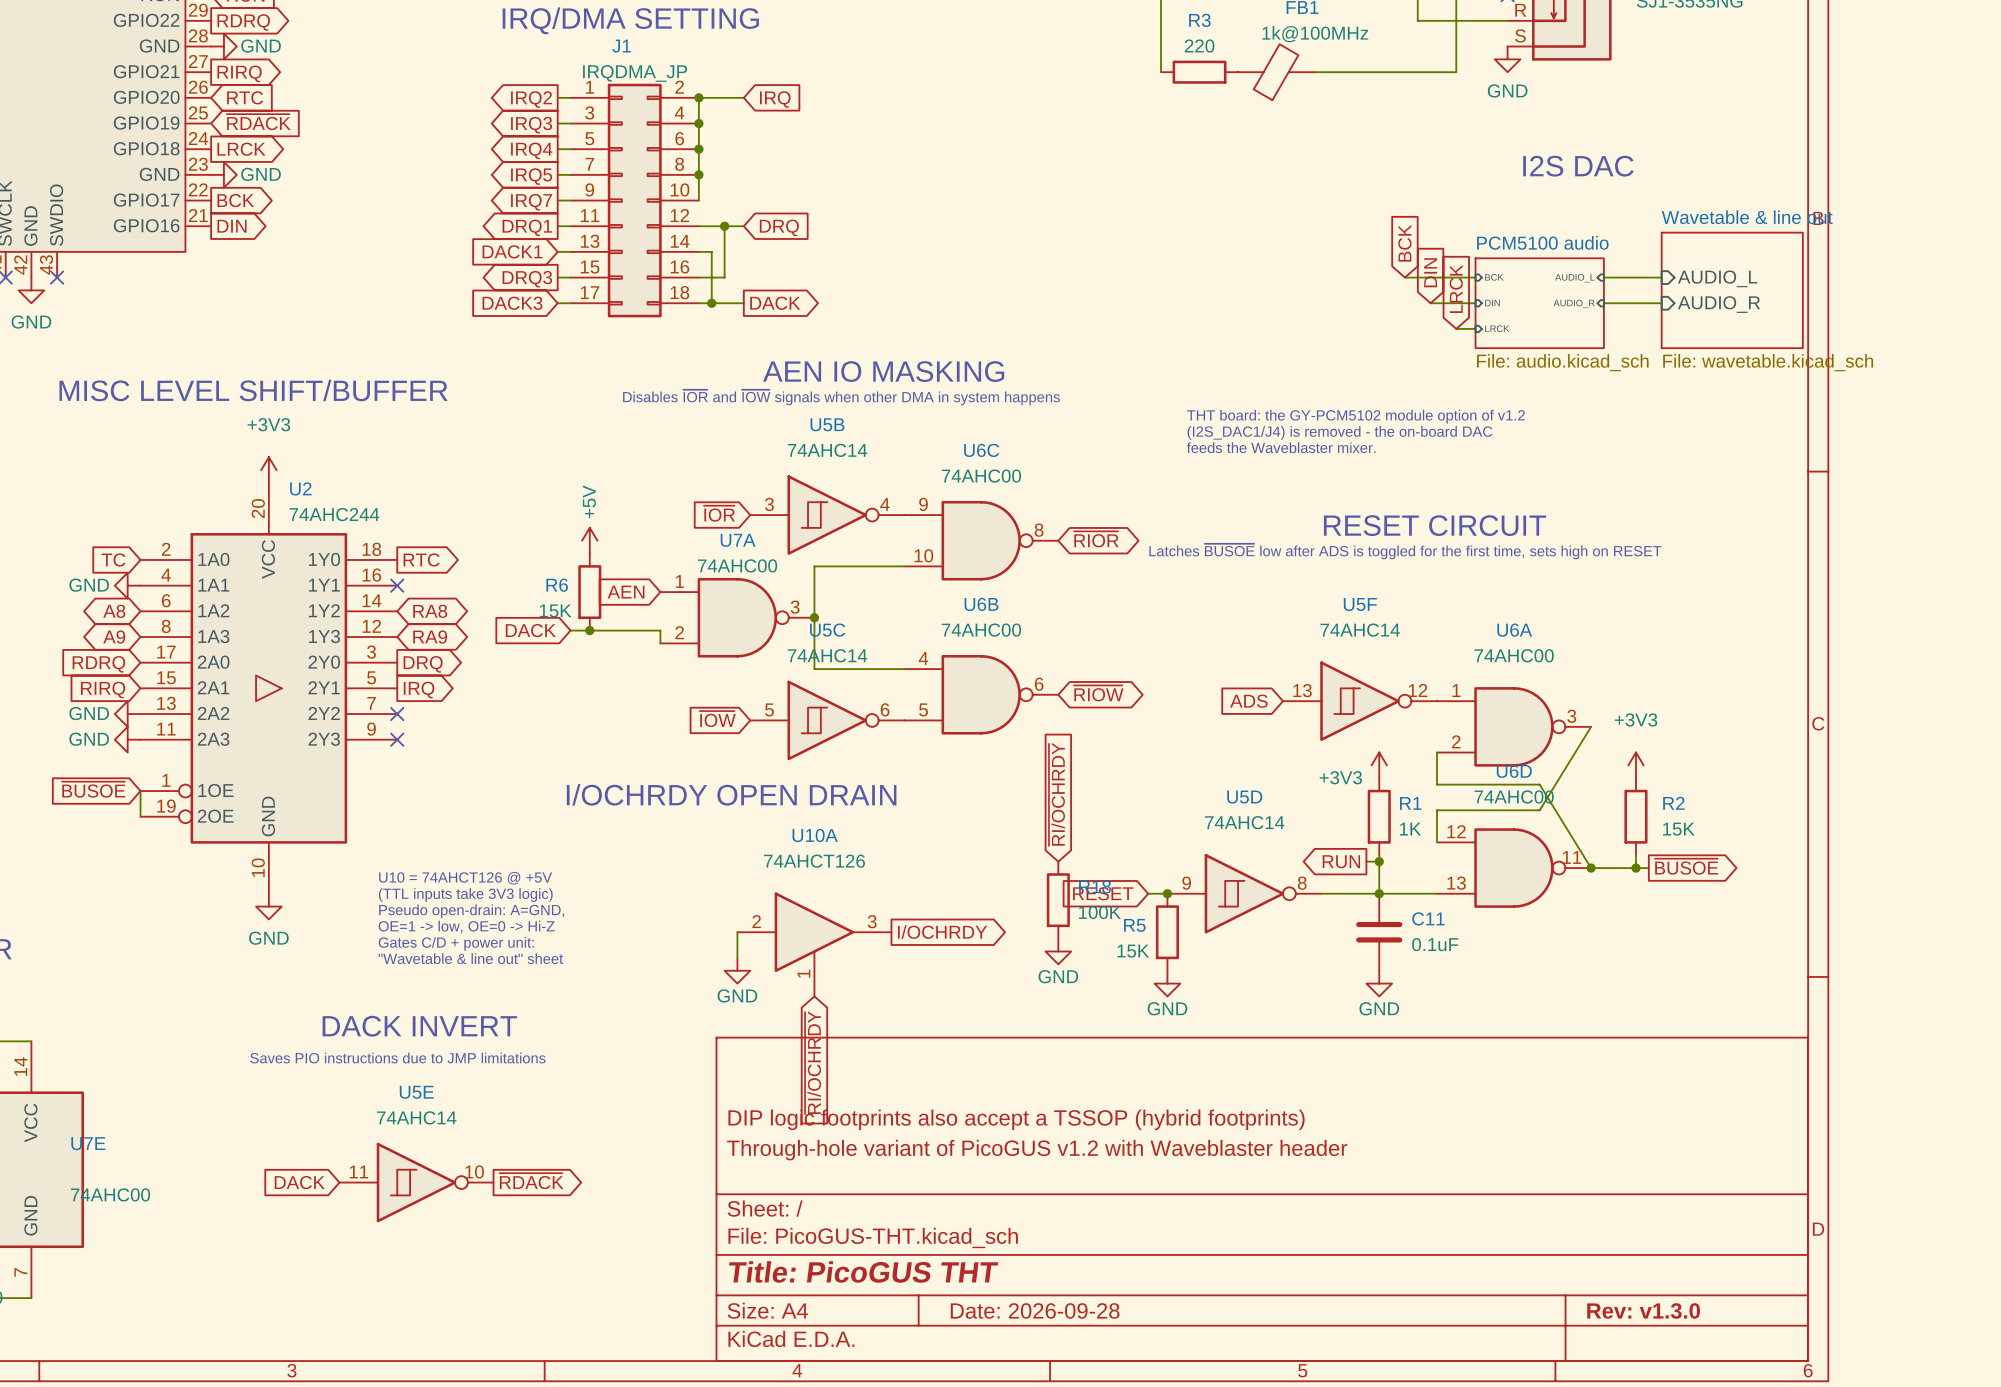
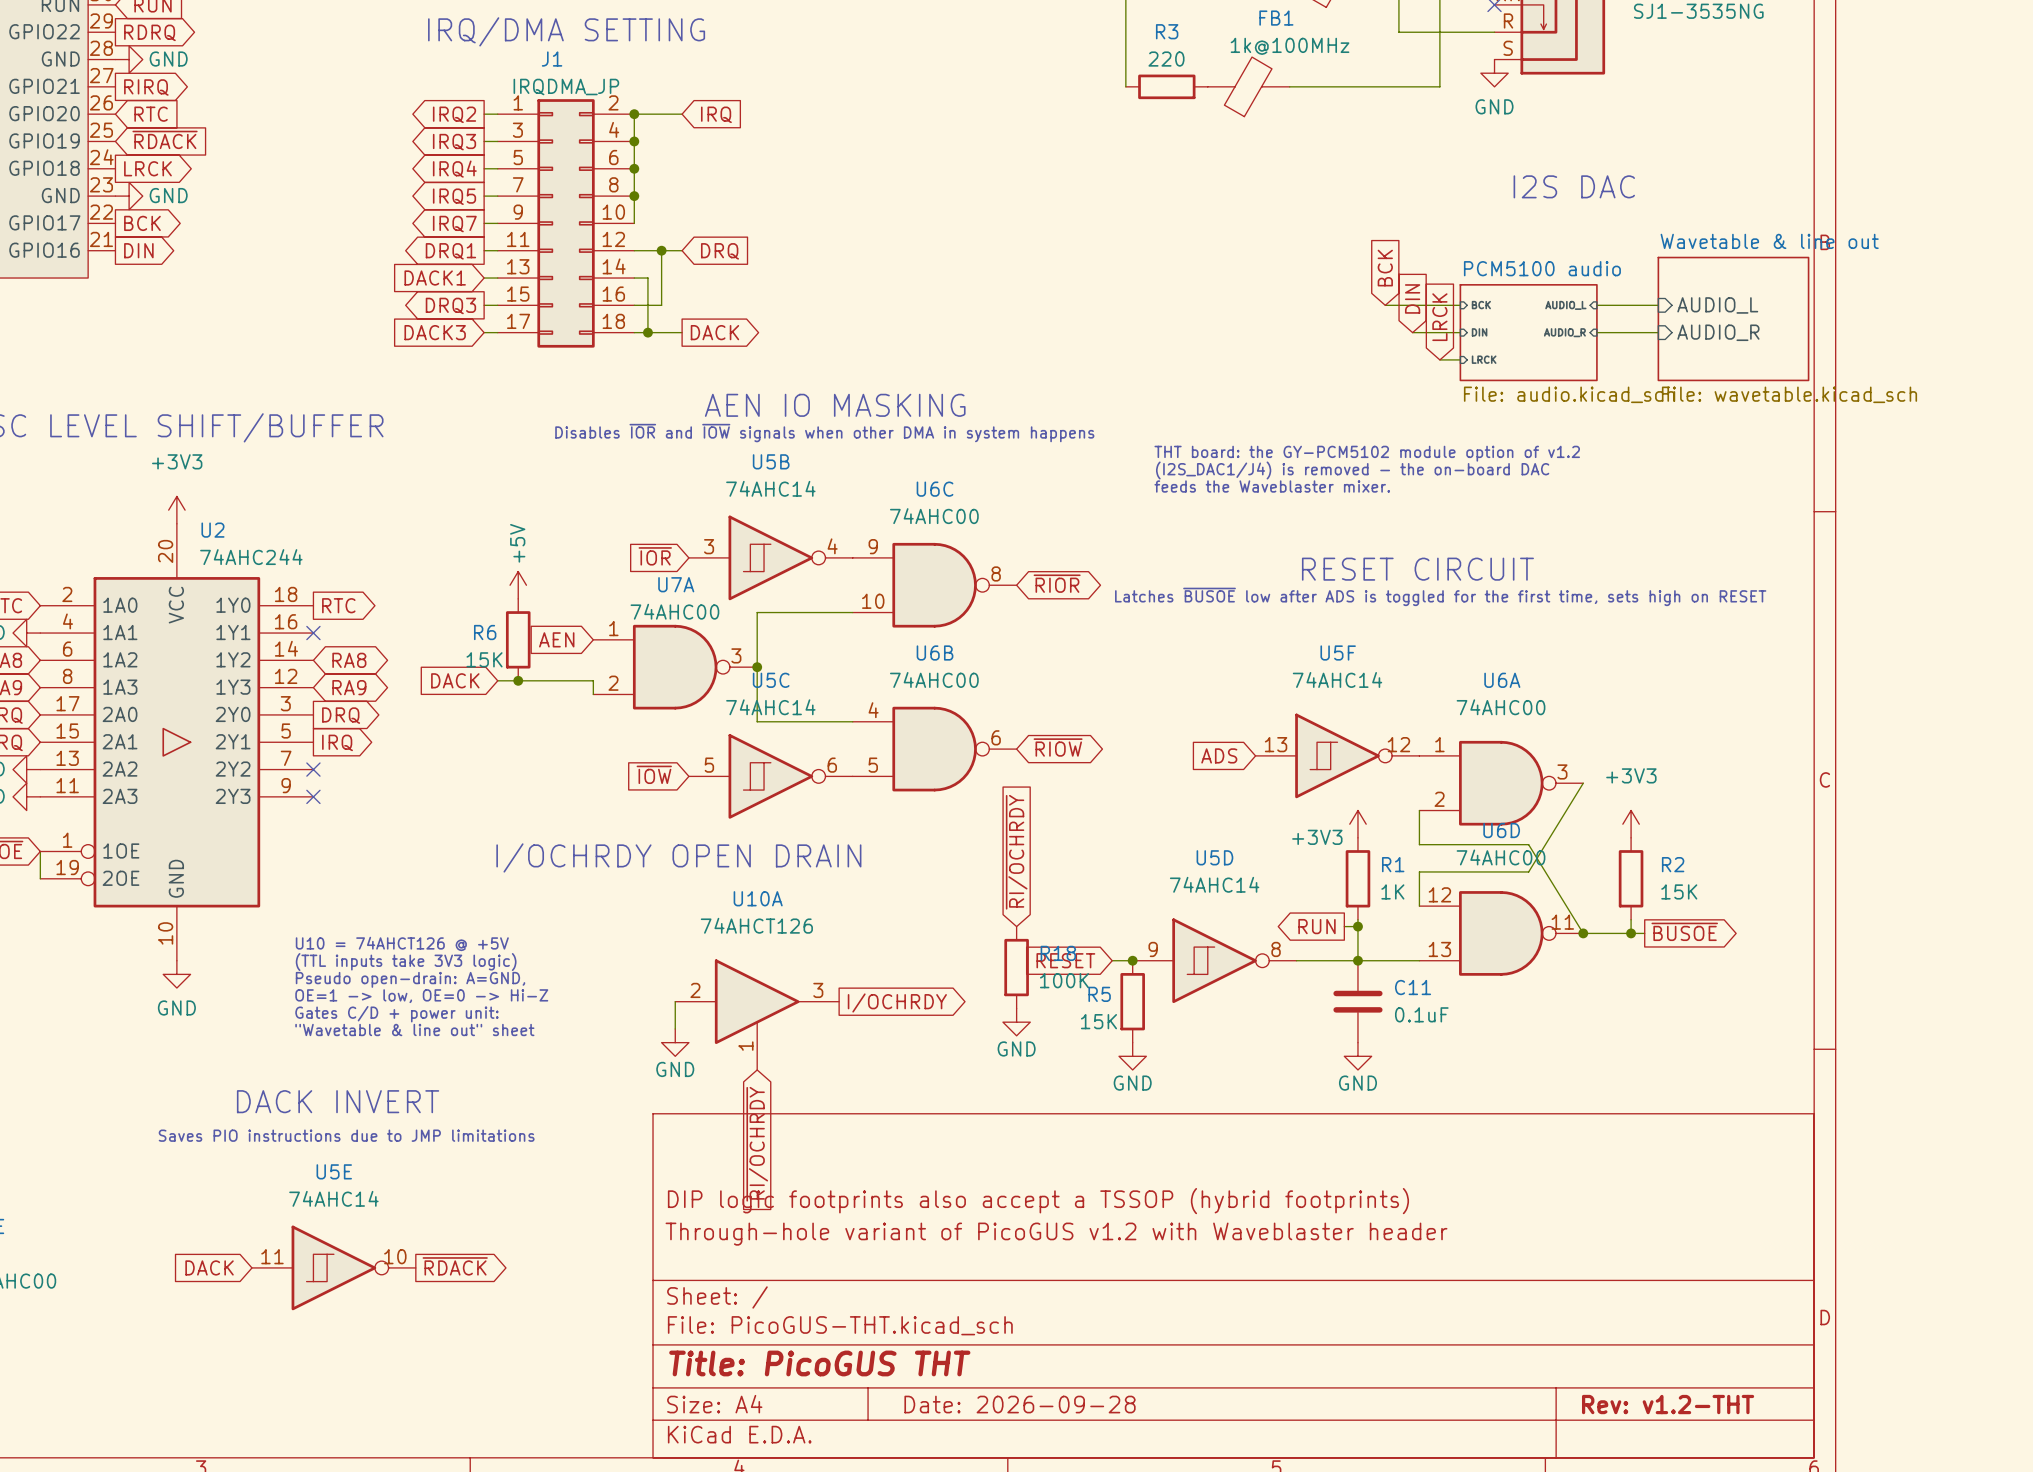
title block: Rev: v1.3.0 (1643, 1310) -> Rev: v1.2-THT (1668, 1404)

